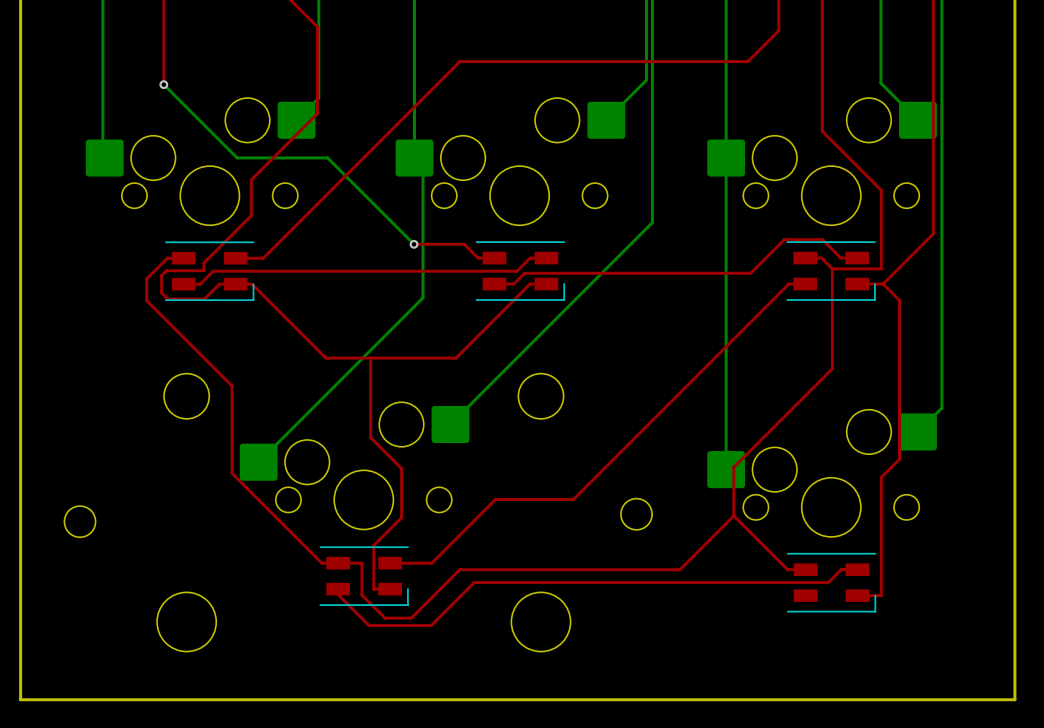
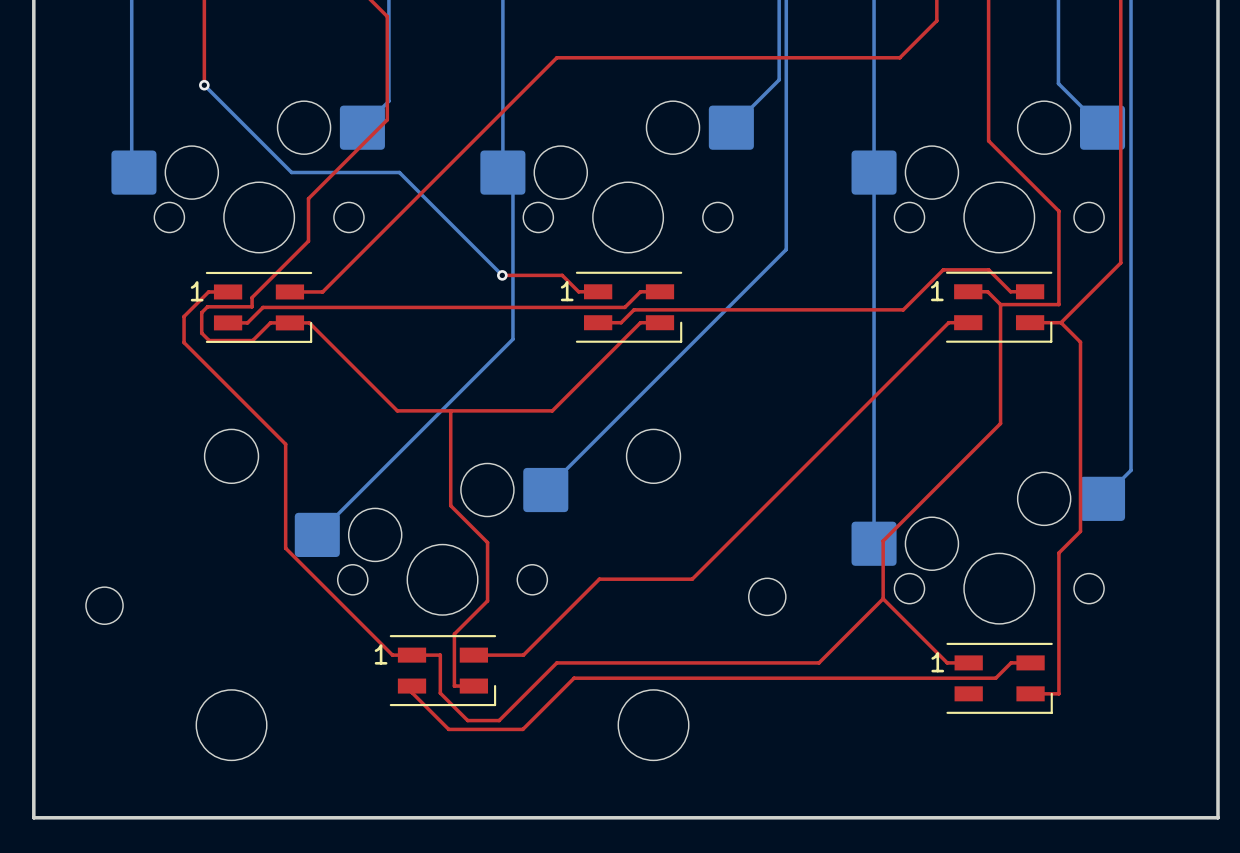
part text: none -> 1 (197, 291)
part text: none -> 1 (567, 291)
part text: none -> 1 (937, 291)
part text: none -> 1 (381, 654)
part text: none -> 1 (937, 662)

